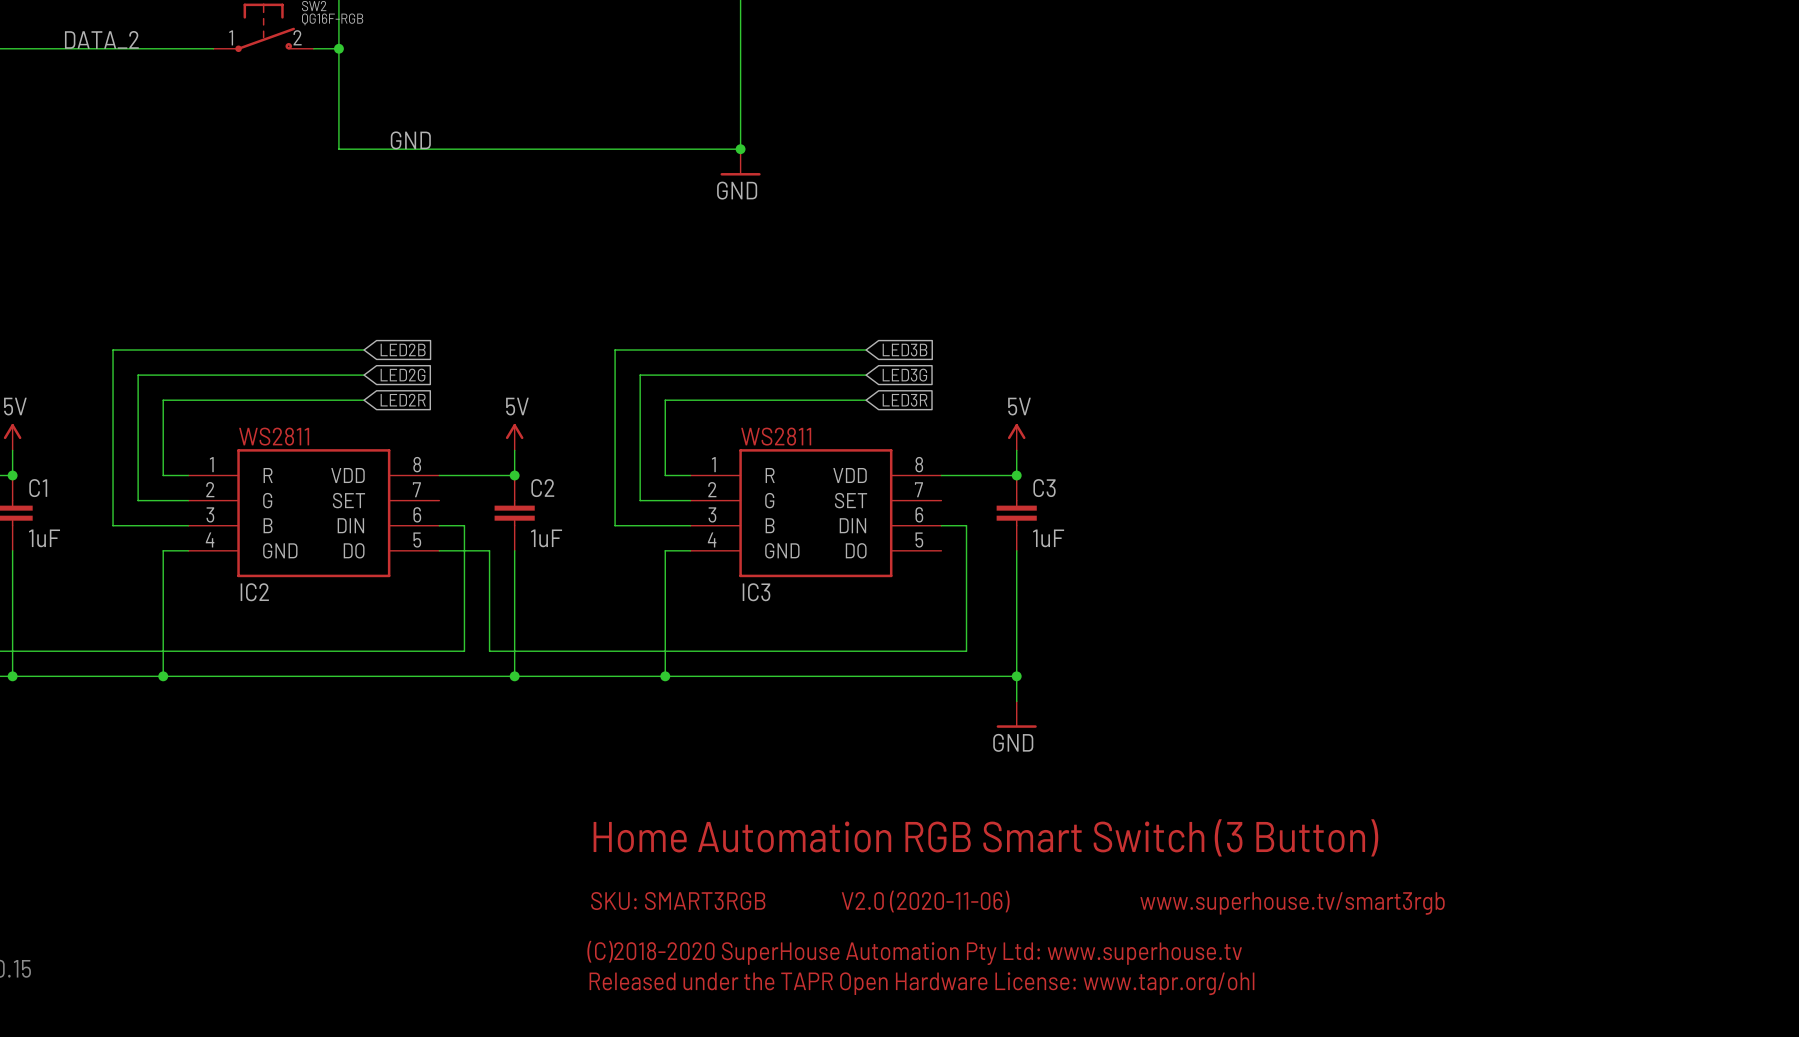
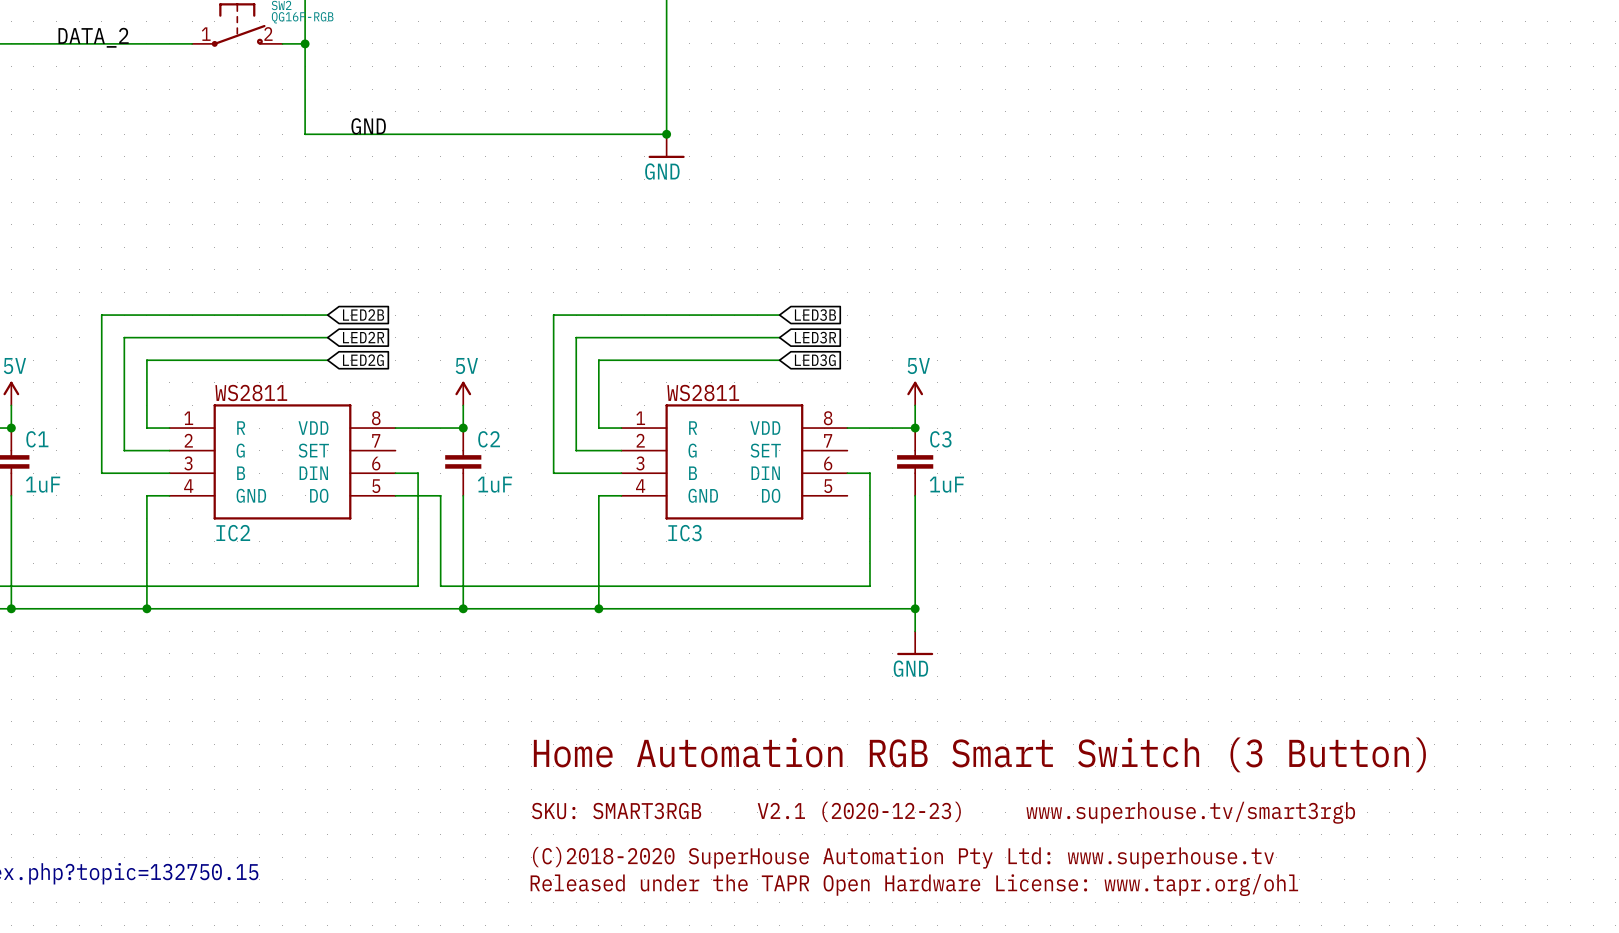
global label: LED2G (403, 375) -> LED2R (363, 337)
global label: LED3G (904, 375) -> LED3R (815, 337)
global label: LED2R (403, 400) -> LED2G (363, 360)
global label: LED3R (905, 400) -> LED3G (815, 360)
text: V2.0 (2020-11-06) (925, 901) -> V2.1 (2020-12-23) (859, 811)

